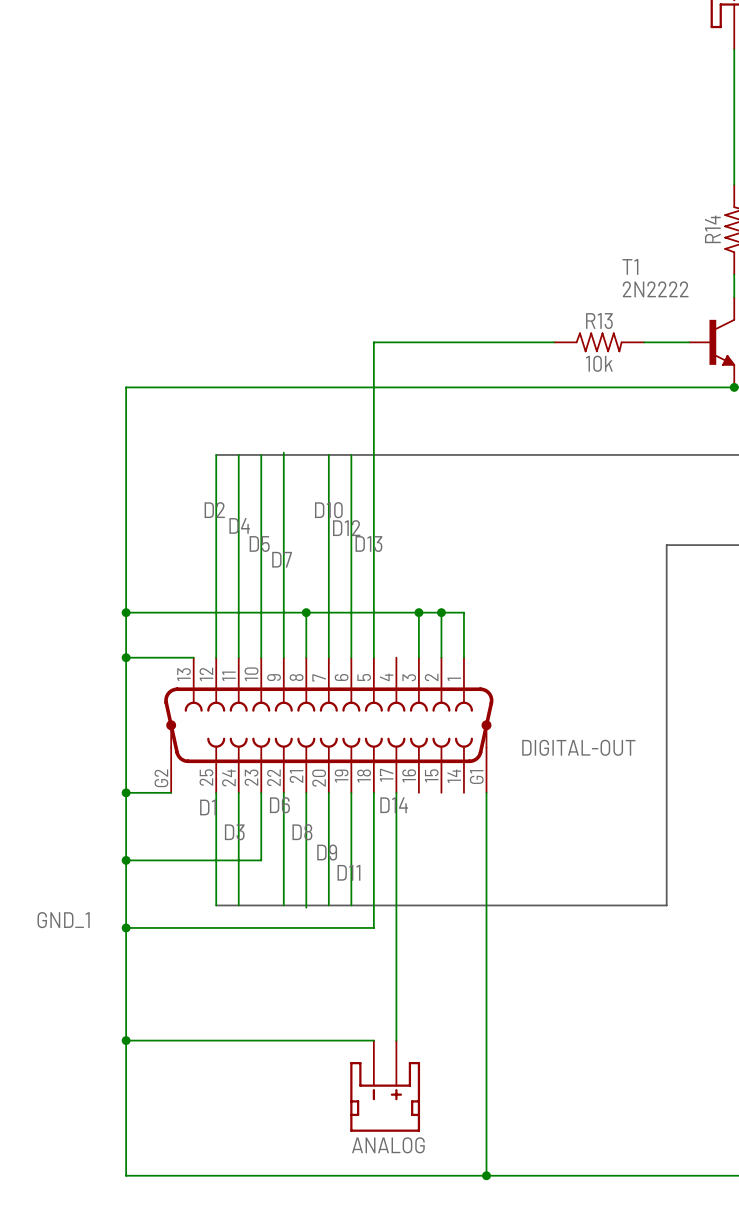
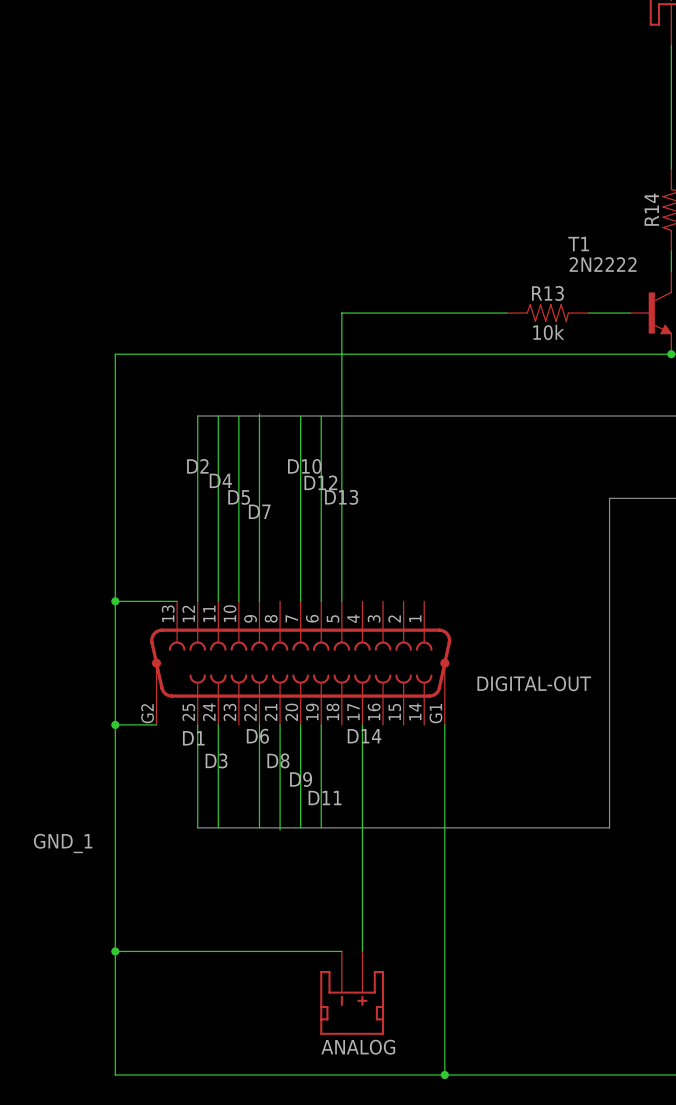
wire: (126, 612) (463, 612) (463, 657) -> none
junction: (126, 612) -> none
wire: (306, 612) (306, 657) -> none
junction: (306, 612) -> none
wire: (418, 612) (418, 657) -> none
junction: (418, 612) -> none
wire: (441, 612) (441, 657) -> none
junction: (441, 612) -> none
wire: (261, 792) (261, 860) (126, 860) -> none
wire: (373, 792) (373, 927) (126, 927) -> none
junction: (126, 860) -> none
junction: (126, 927) -> none

